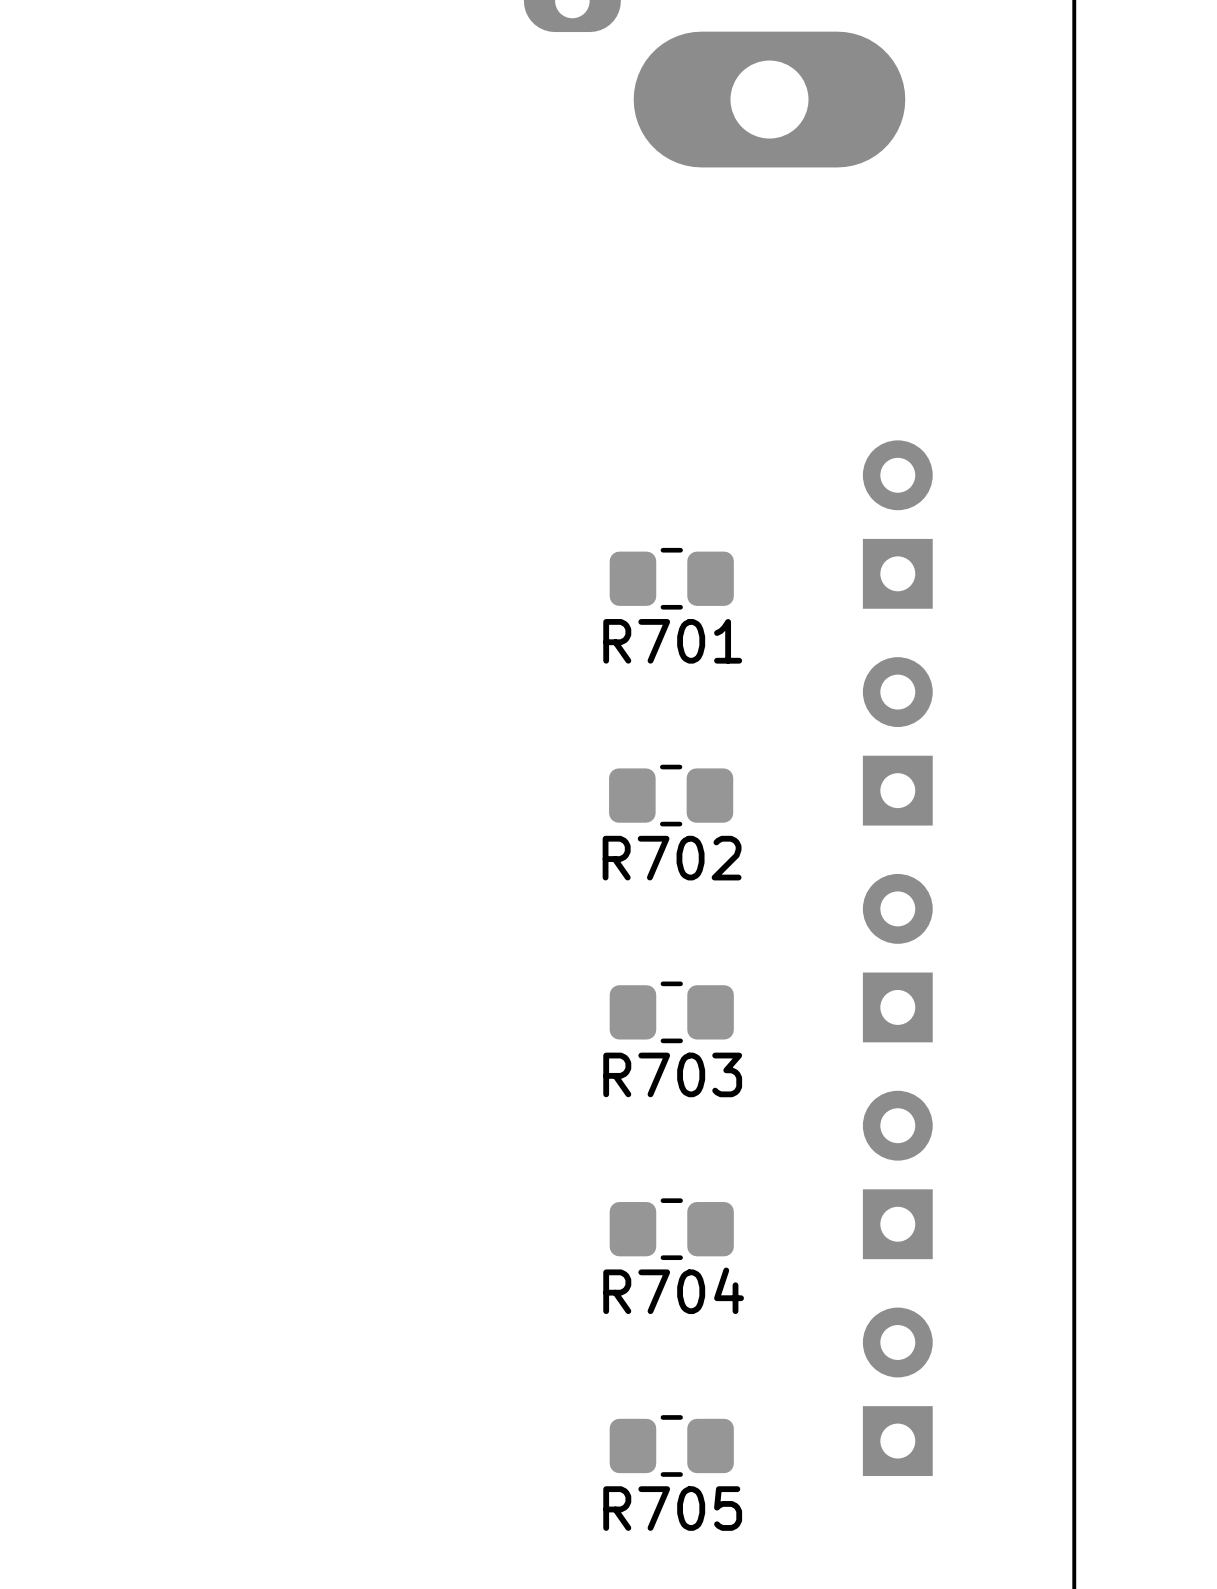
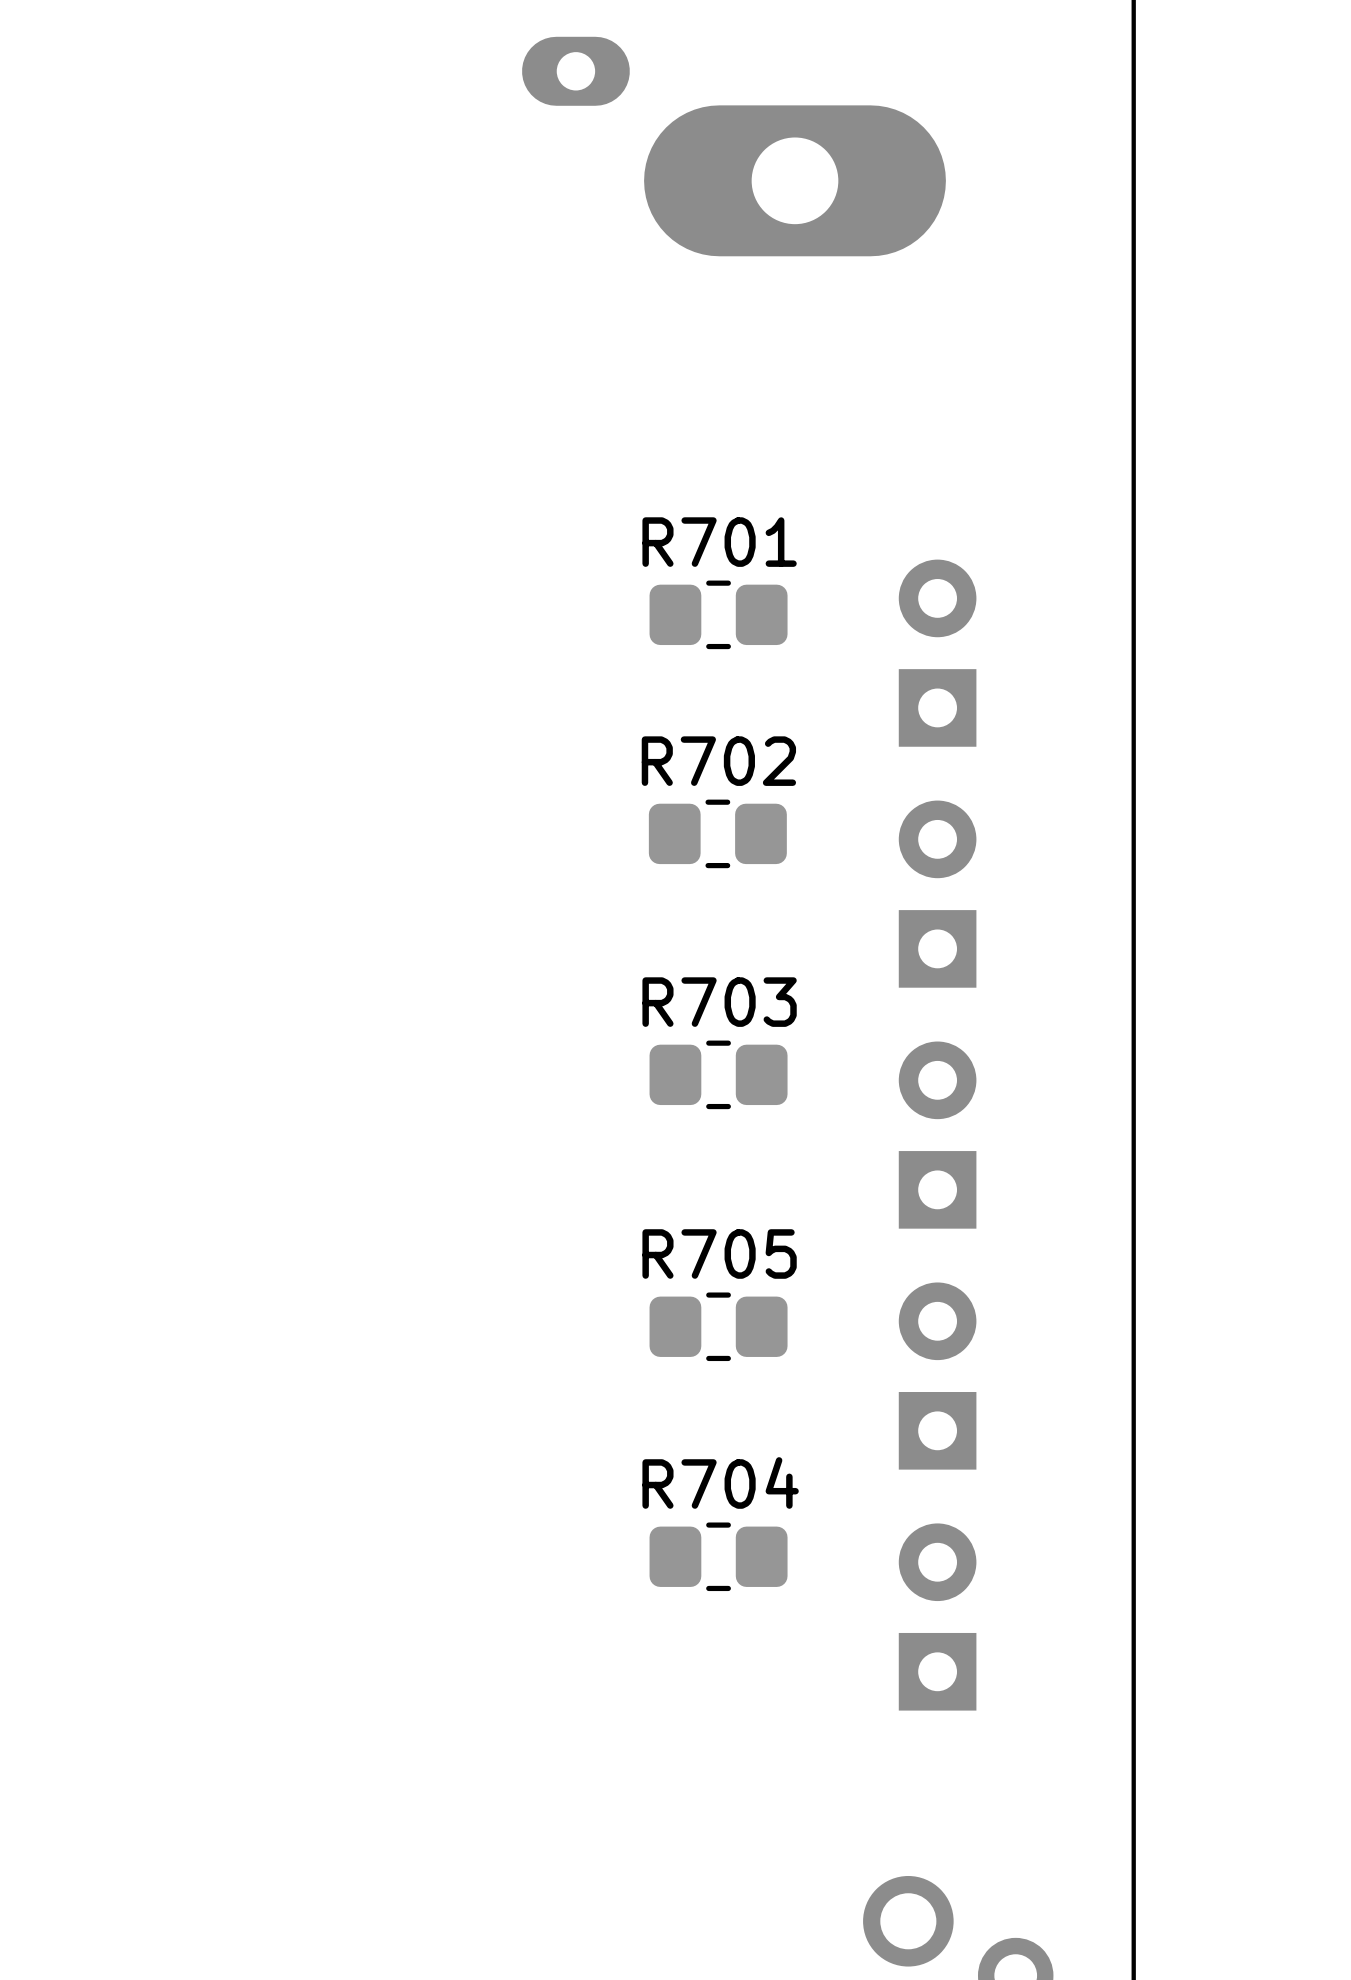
R701 position: (671, 578) -> (718, 614)
R701 name position: R701 (672, 641) -> R701 (719, 542)
R702 position: (671, 795) -> (717, 833)
R702 name position: R702 (672, 858) -> R702 (718, 761)
R703 position: (671, 1012) -> (718, 1074)
R703 name position: R703 (672, 1074) -> R703 (719, 1002)
R704 position: (671, 1229) -> (718, 1556)
R704 name position: R704 (673, 1290) -> R704 (720, 1482)
R705 position: (671, 1445) -> (718, 1326)
R705 name position: R705 (672, 1508) -> R705 (719, 1254)

